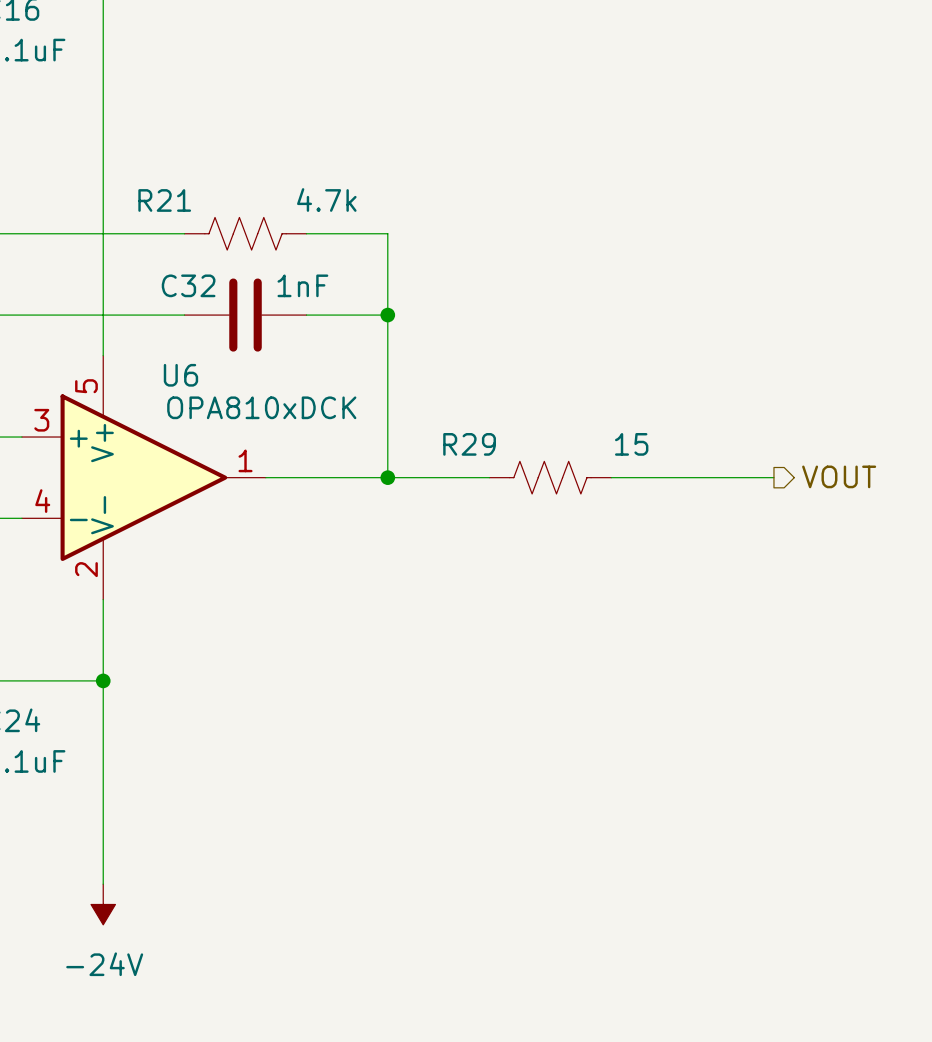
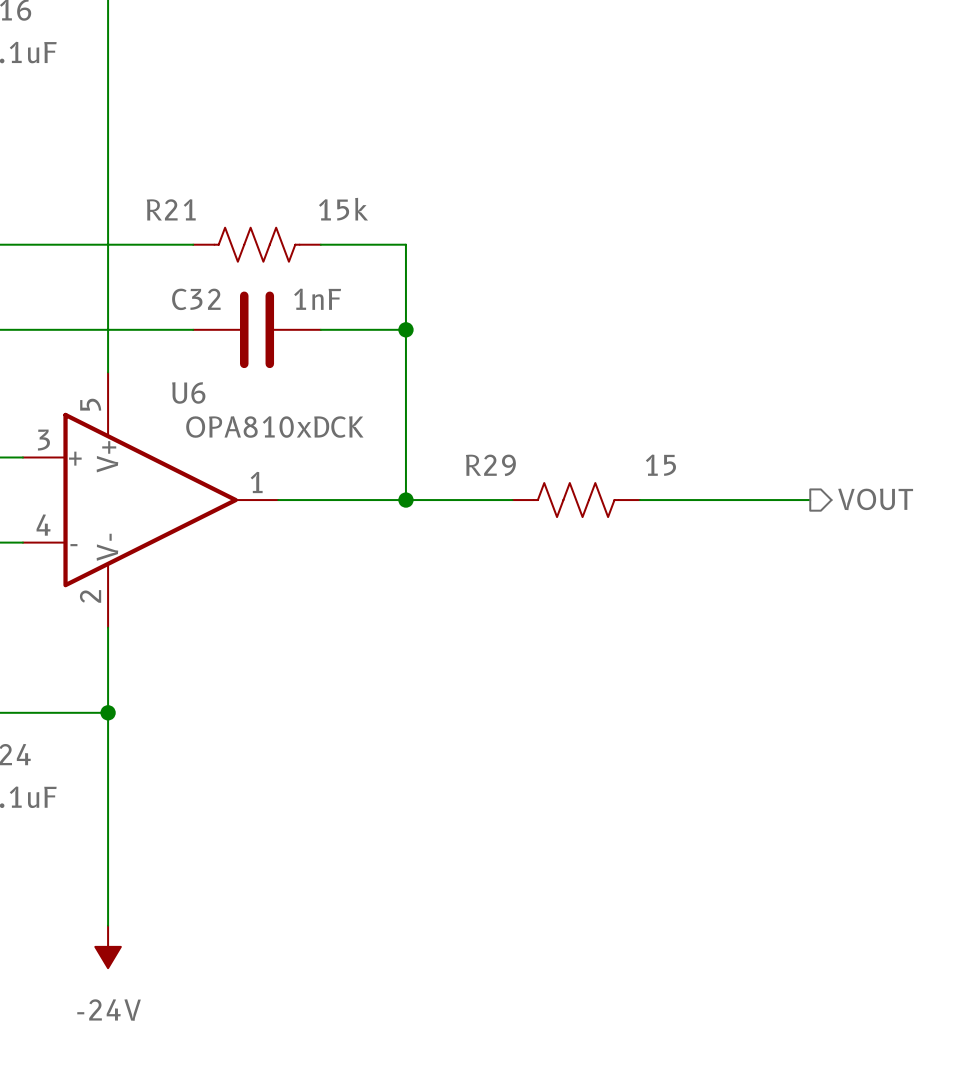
R21 value: 4.7k (326, 199) -> 15k (343, 209)

